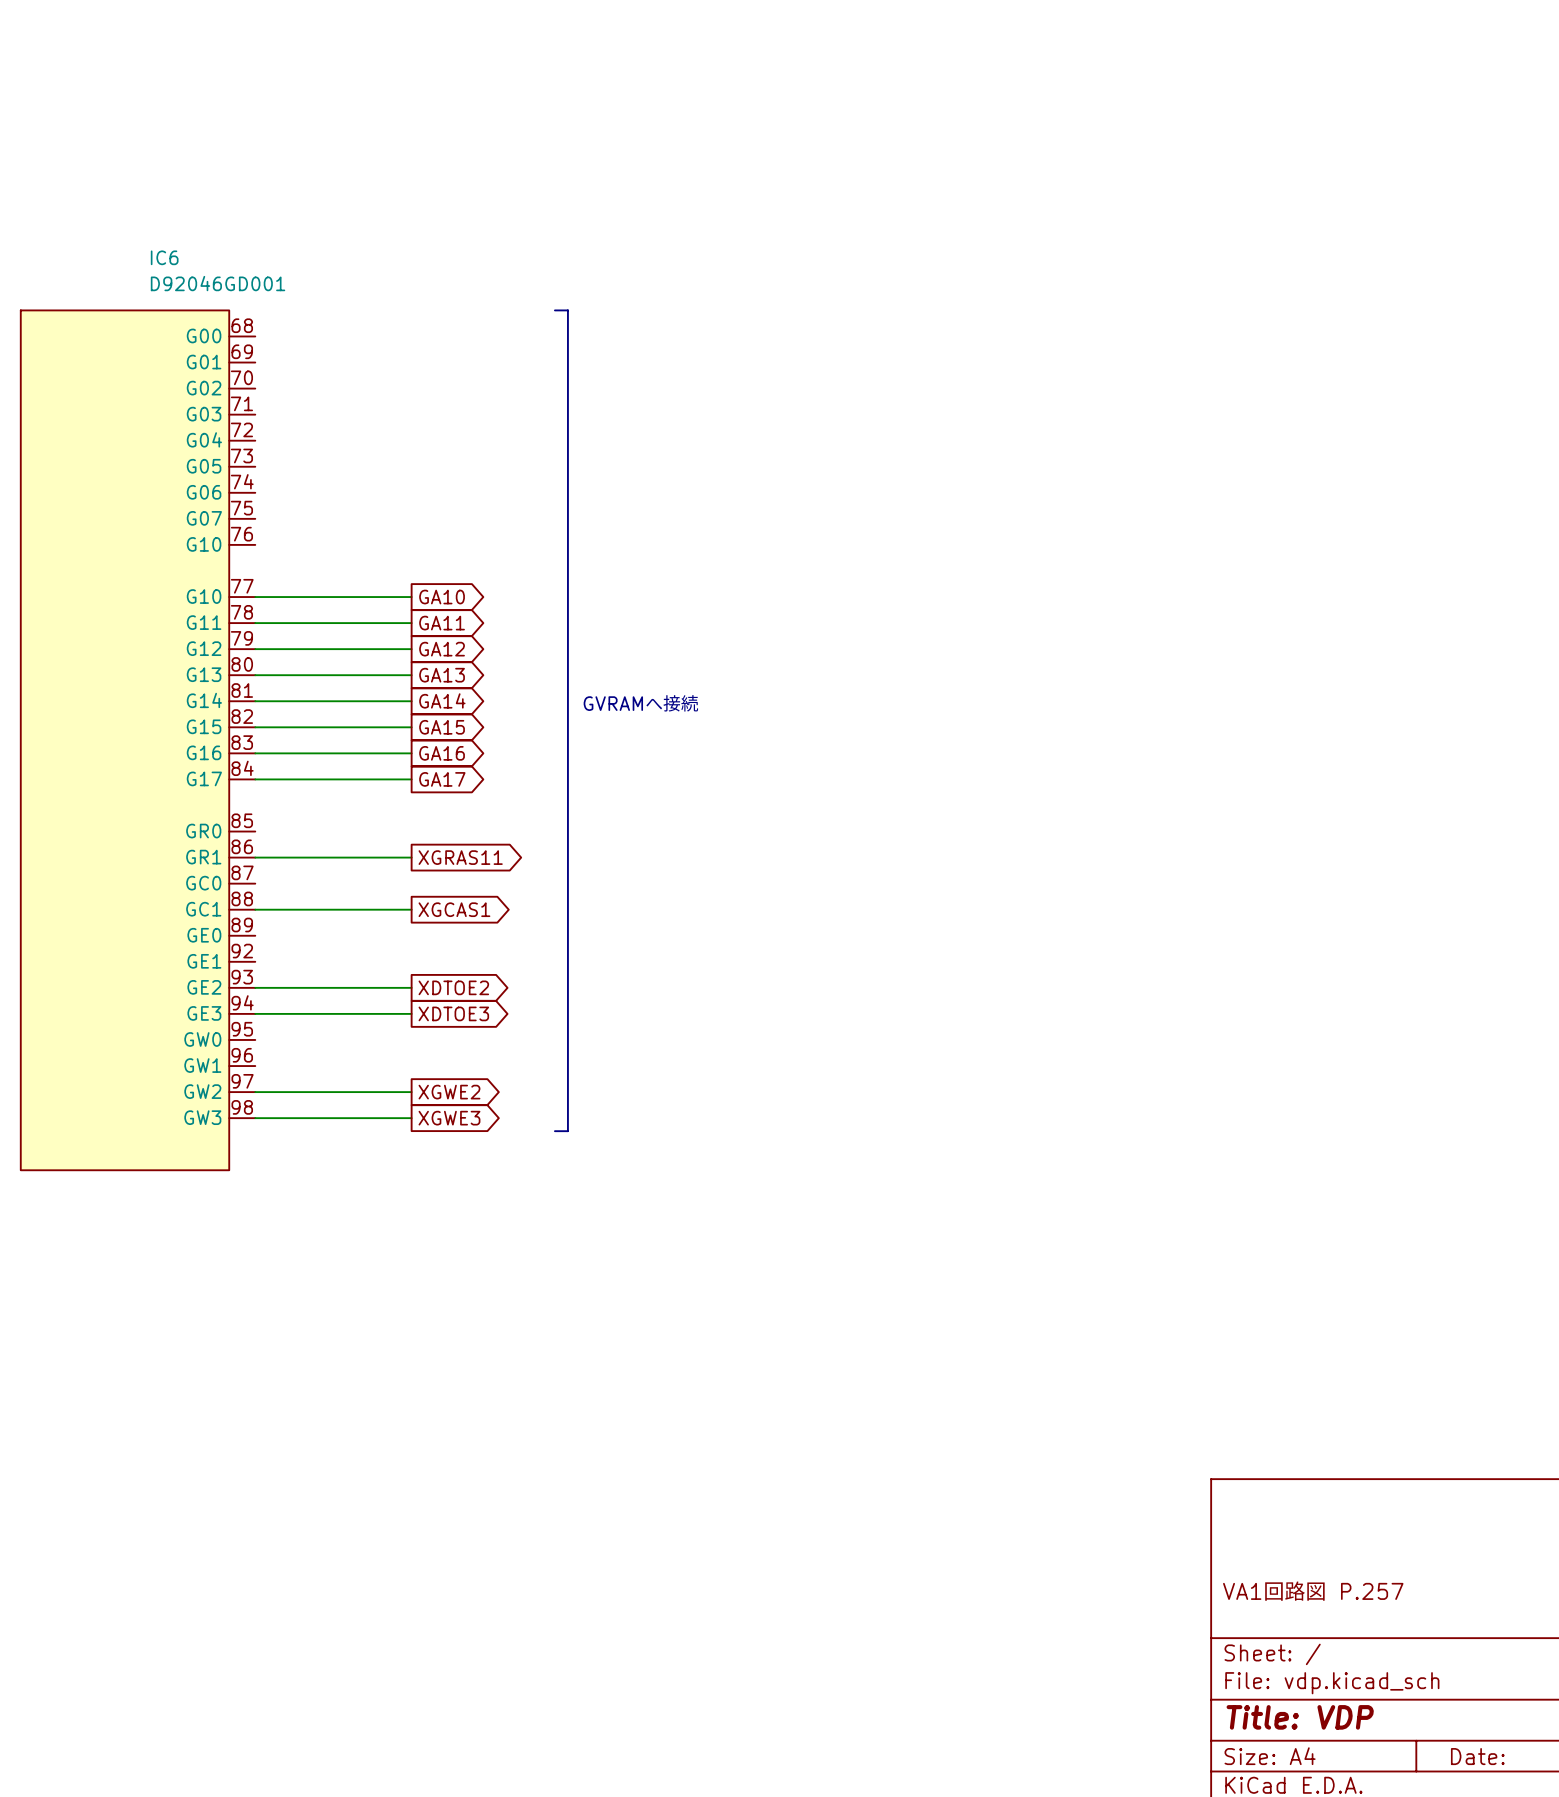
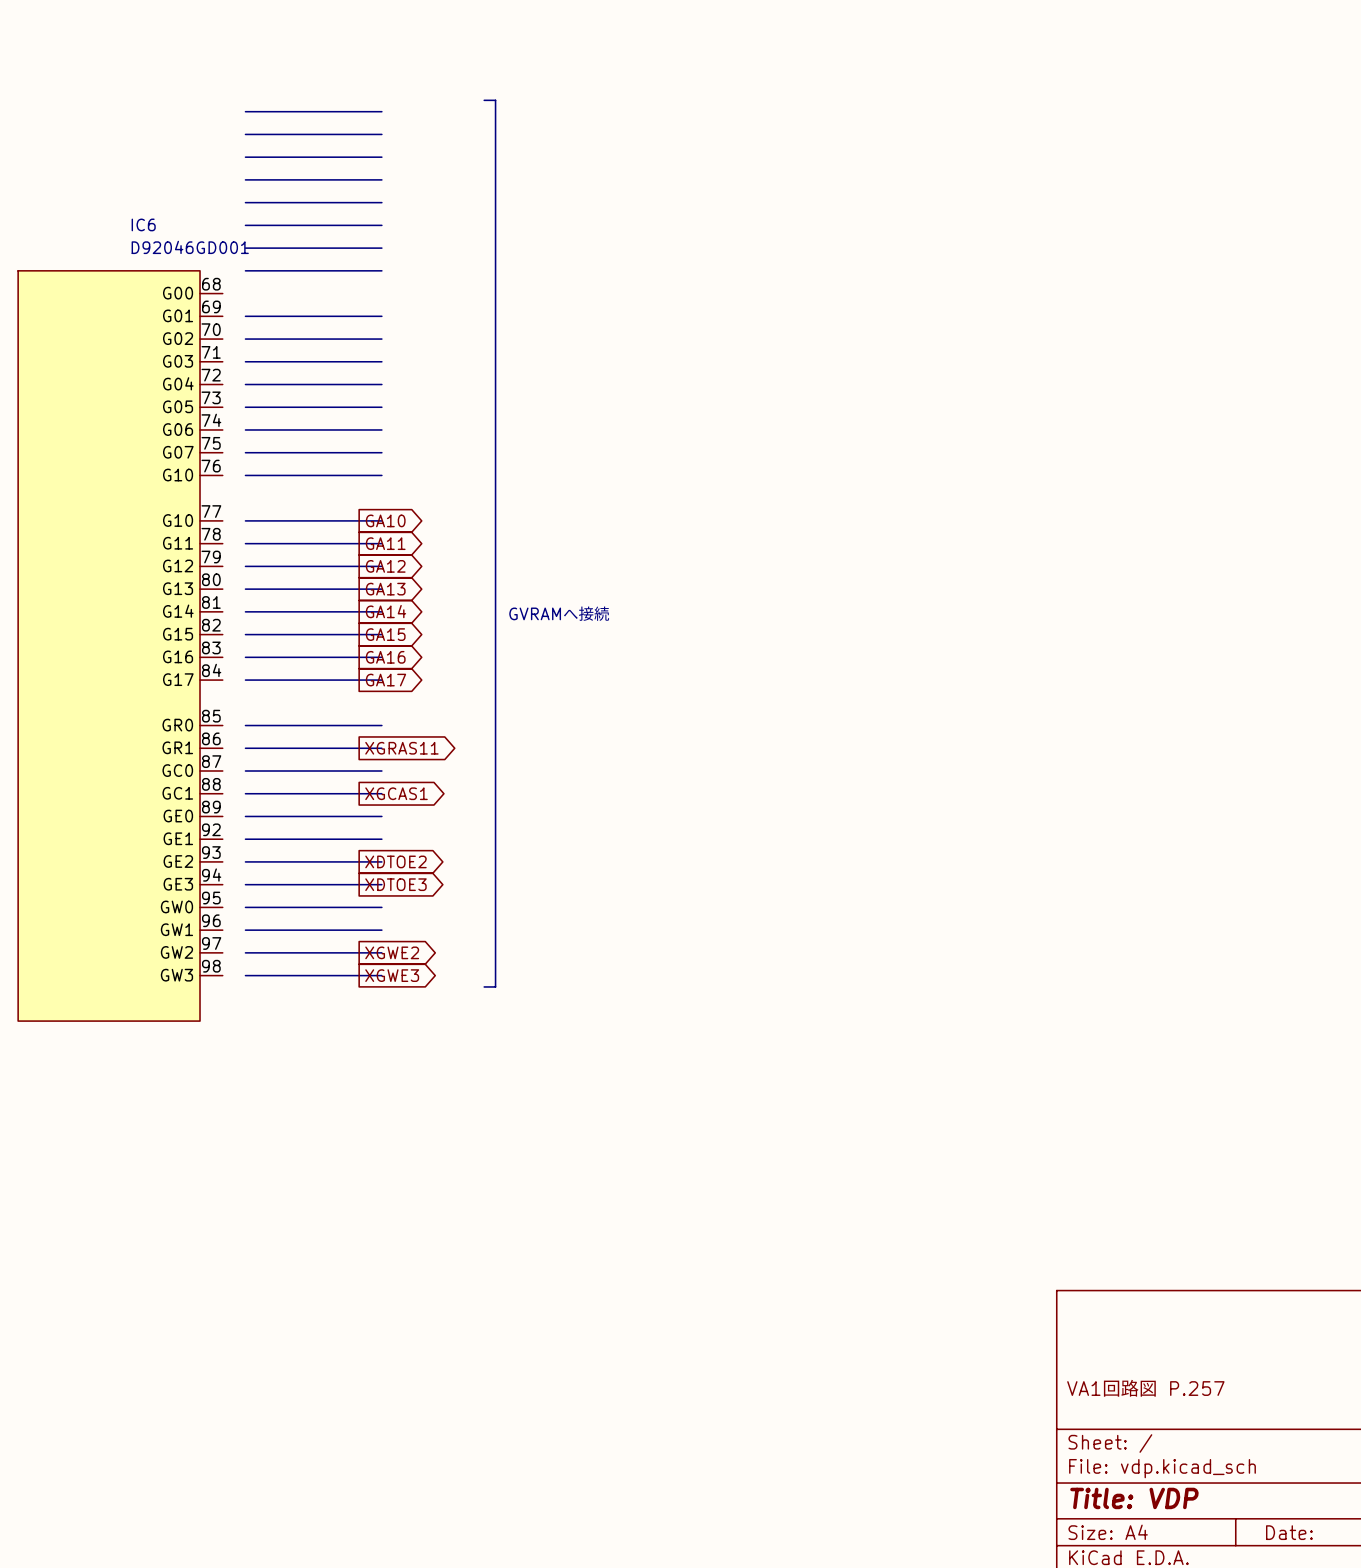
wire: none -> (245, 111) (381, 111)
wire: none -> (245, 134) (381, 134)
wire: none -> (245, 157) (381, 157)
wire: none -> (245, 179) (381, 179)
wire: none -> (245, 202) (381, 202)
wire: none -> (245, 225) (381, 225)
wire: none -> (245, 248) (381, 248)
wire: none -> (245, 270) (381, 270)
line: (554, 310) (567, 310) -> (484, 100) (495, 100) (495, 270)
wire: none -> (245, 316) (381, 316)
wire: none -> (245, 339) (381, 339)
wire: none -> (245, 361) (381, 361)
wire: none -> (245, 384) (381, 384)
wire: none -> (245, 407) (381, 407)
wire: none -> (245, 429) (381, 429)
wire: none -> (245, 452) (381, 452)
wire: none -> (245, 475) (381, 475)
wire: (255, 597) (281, 597) -> (359, 520) (381, 520)
wire: (255, 623) (281, 623) -> (359, 543) (381, 543)
wire: (255, 649) (281, 649) -> (359, 566) (381, 566)
wire: (255, 675) (281, 675) -> (359, 589) (381, 589)
wire: (255, 701) (281, 701) -> (359, 611) (381, 611)
wire: (255, 727) (281, 727) -> (359, 634) (381, 634)
wire: (255, 753) (281, 753) -> (359, 657) (381, 657)
wire: (255, 779) (281, 779) -> (359, 680) (381, 680)
wire: none -> (245, 725) (381, 725)
wire: (255, 857) (281, 857) -> (359, 748) (381, 748)
wire: none -> (245, 771) (381, 771)
wire: (255, 909) (281, 909) -> (359, 793) (381, 793)
wire: none -> (245, 816) (381, 816)
wire: none -> (245, 839) (381, 839)
wire: (255, 987) (281, 987) -> (359, 861) (381, 861)
wire: (255, 1013) (281, 1013) -> (359, 884) (381, 884)
wire: none -> (245, 907) (381, 907)
wire: none -> (245, 930) (381, 930)
wire: (255, 1092) (281, 1092) -> (359, 952) (381, 952)
wire: (255, 1118) (281, 1118) -> (359, 975) (381, 975)

